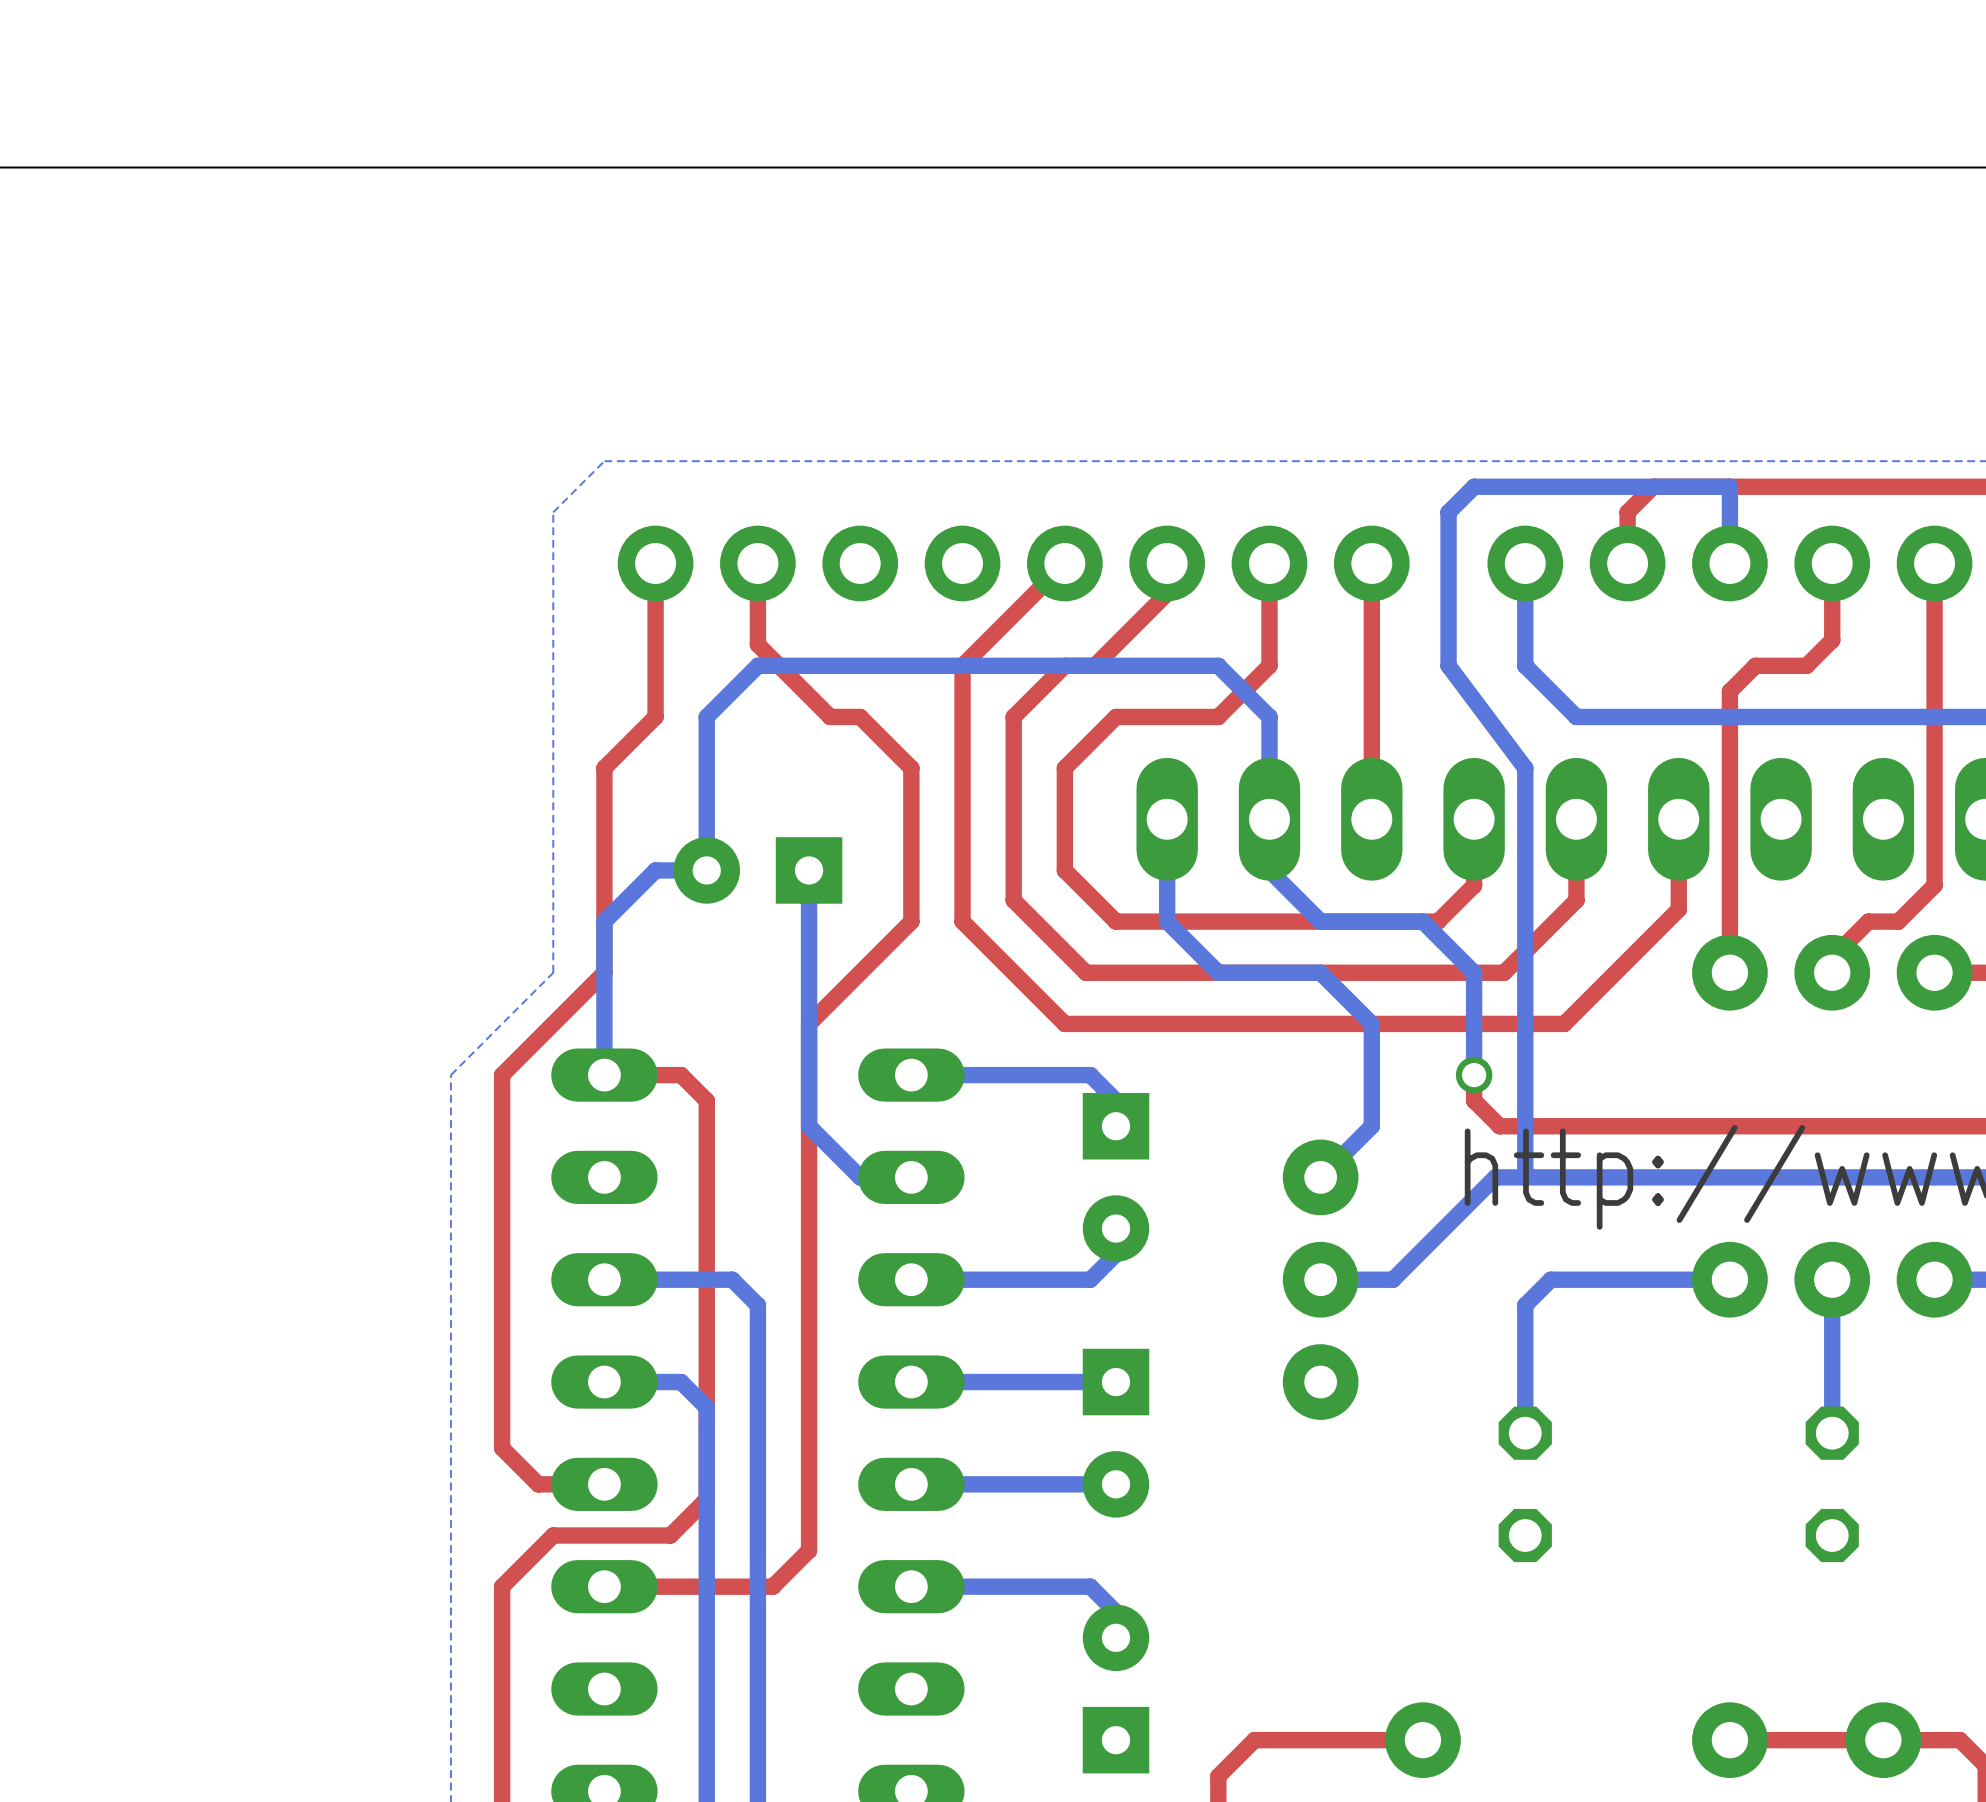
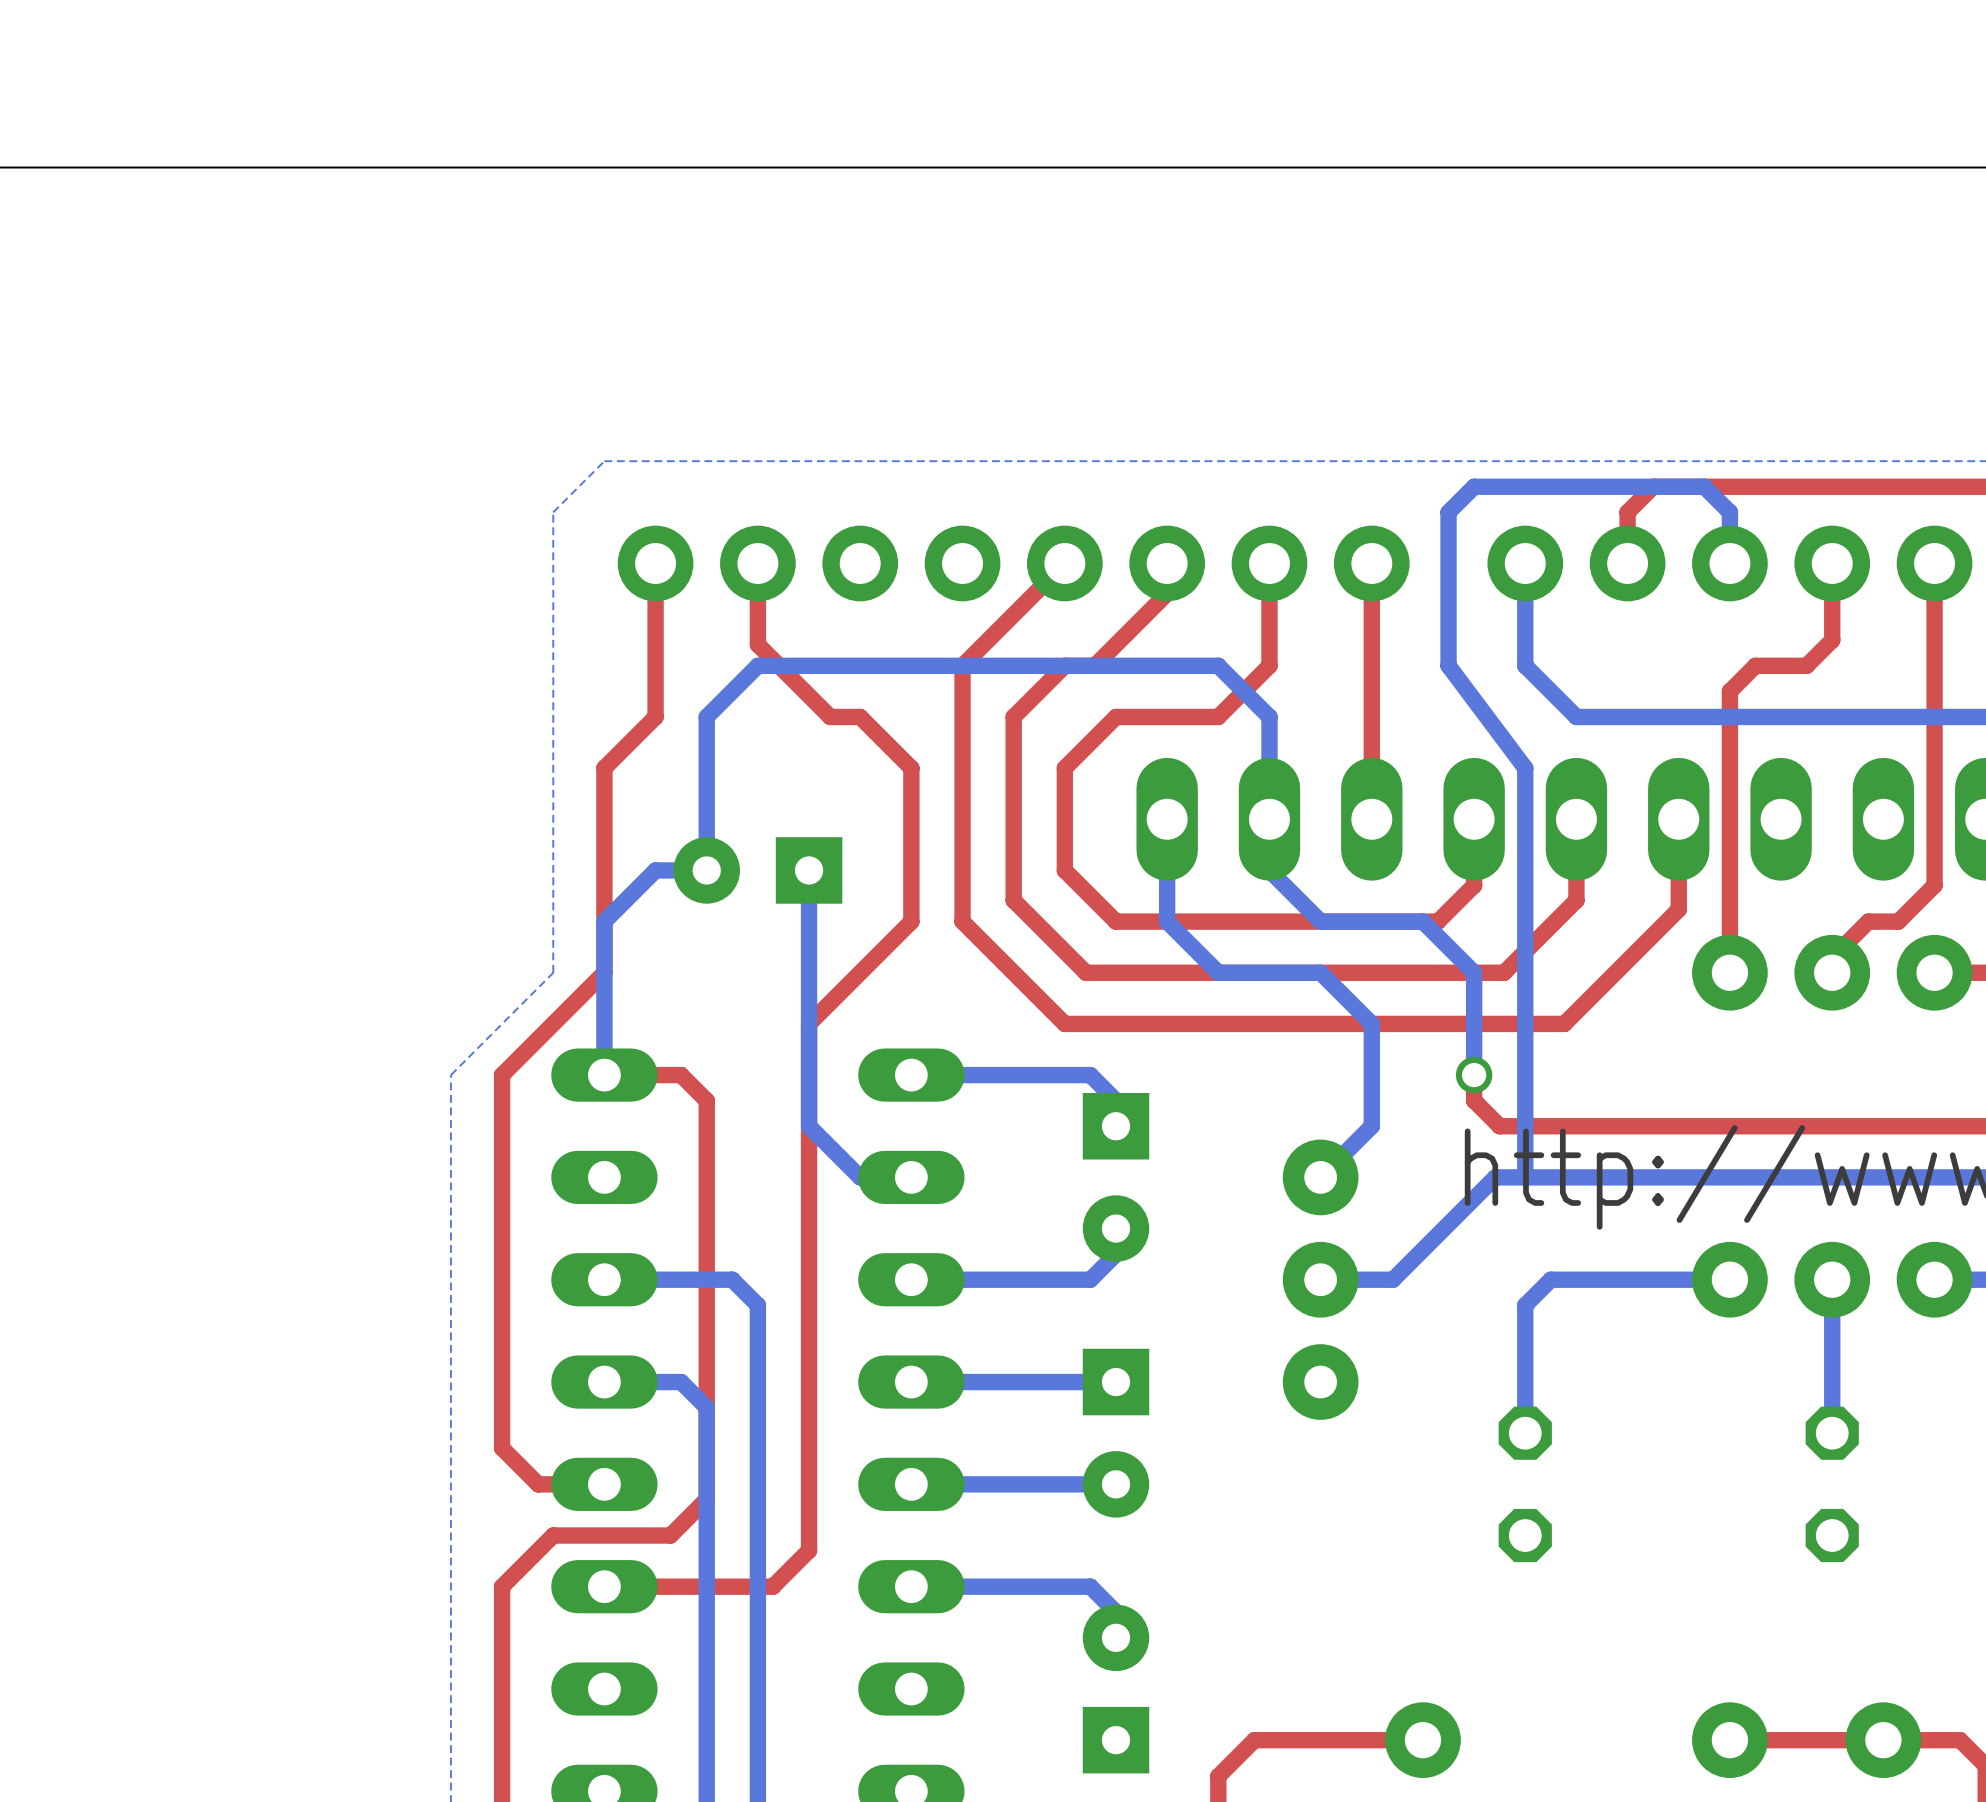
bottom track: (1704, 486) (1729, 486) (1729, 512) -> (1704, 486) (1729, 512)

